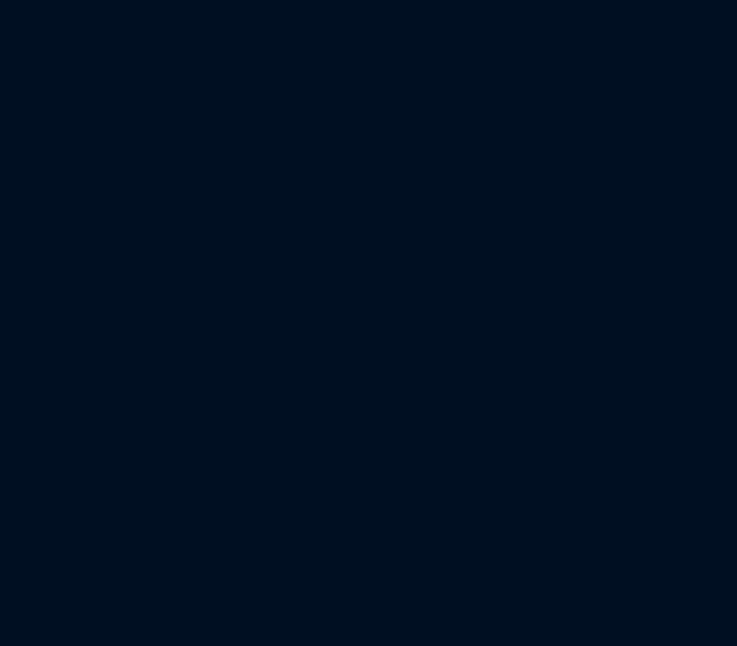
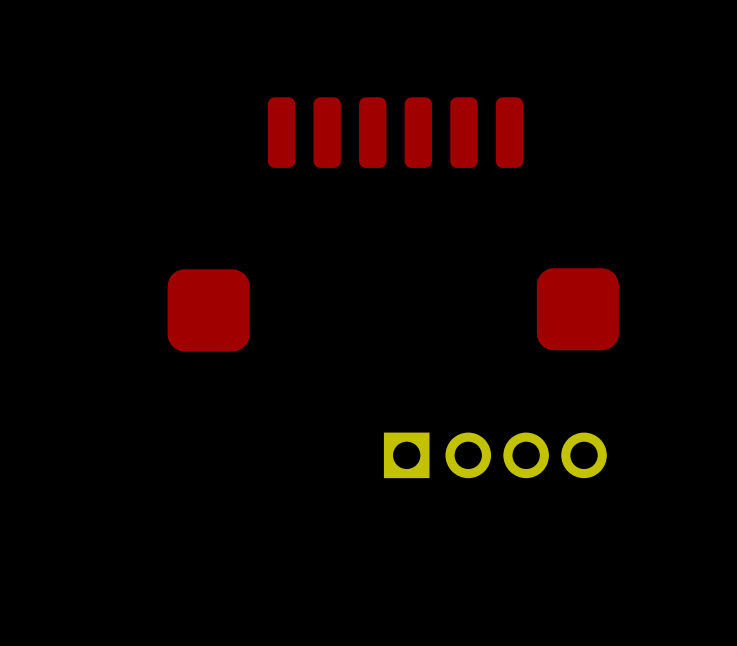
part: none -> (393, 224)
part: none -> (495, 455)

